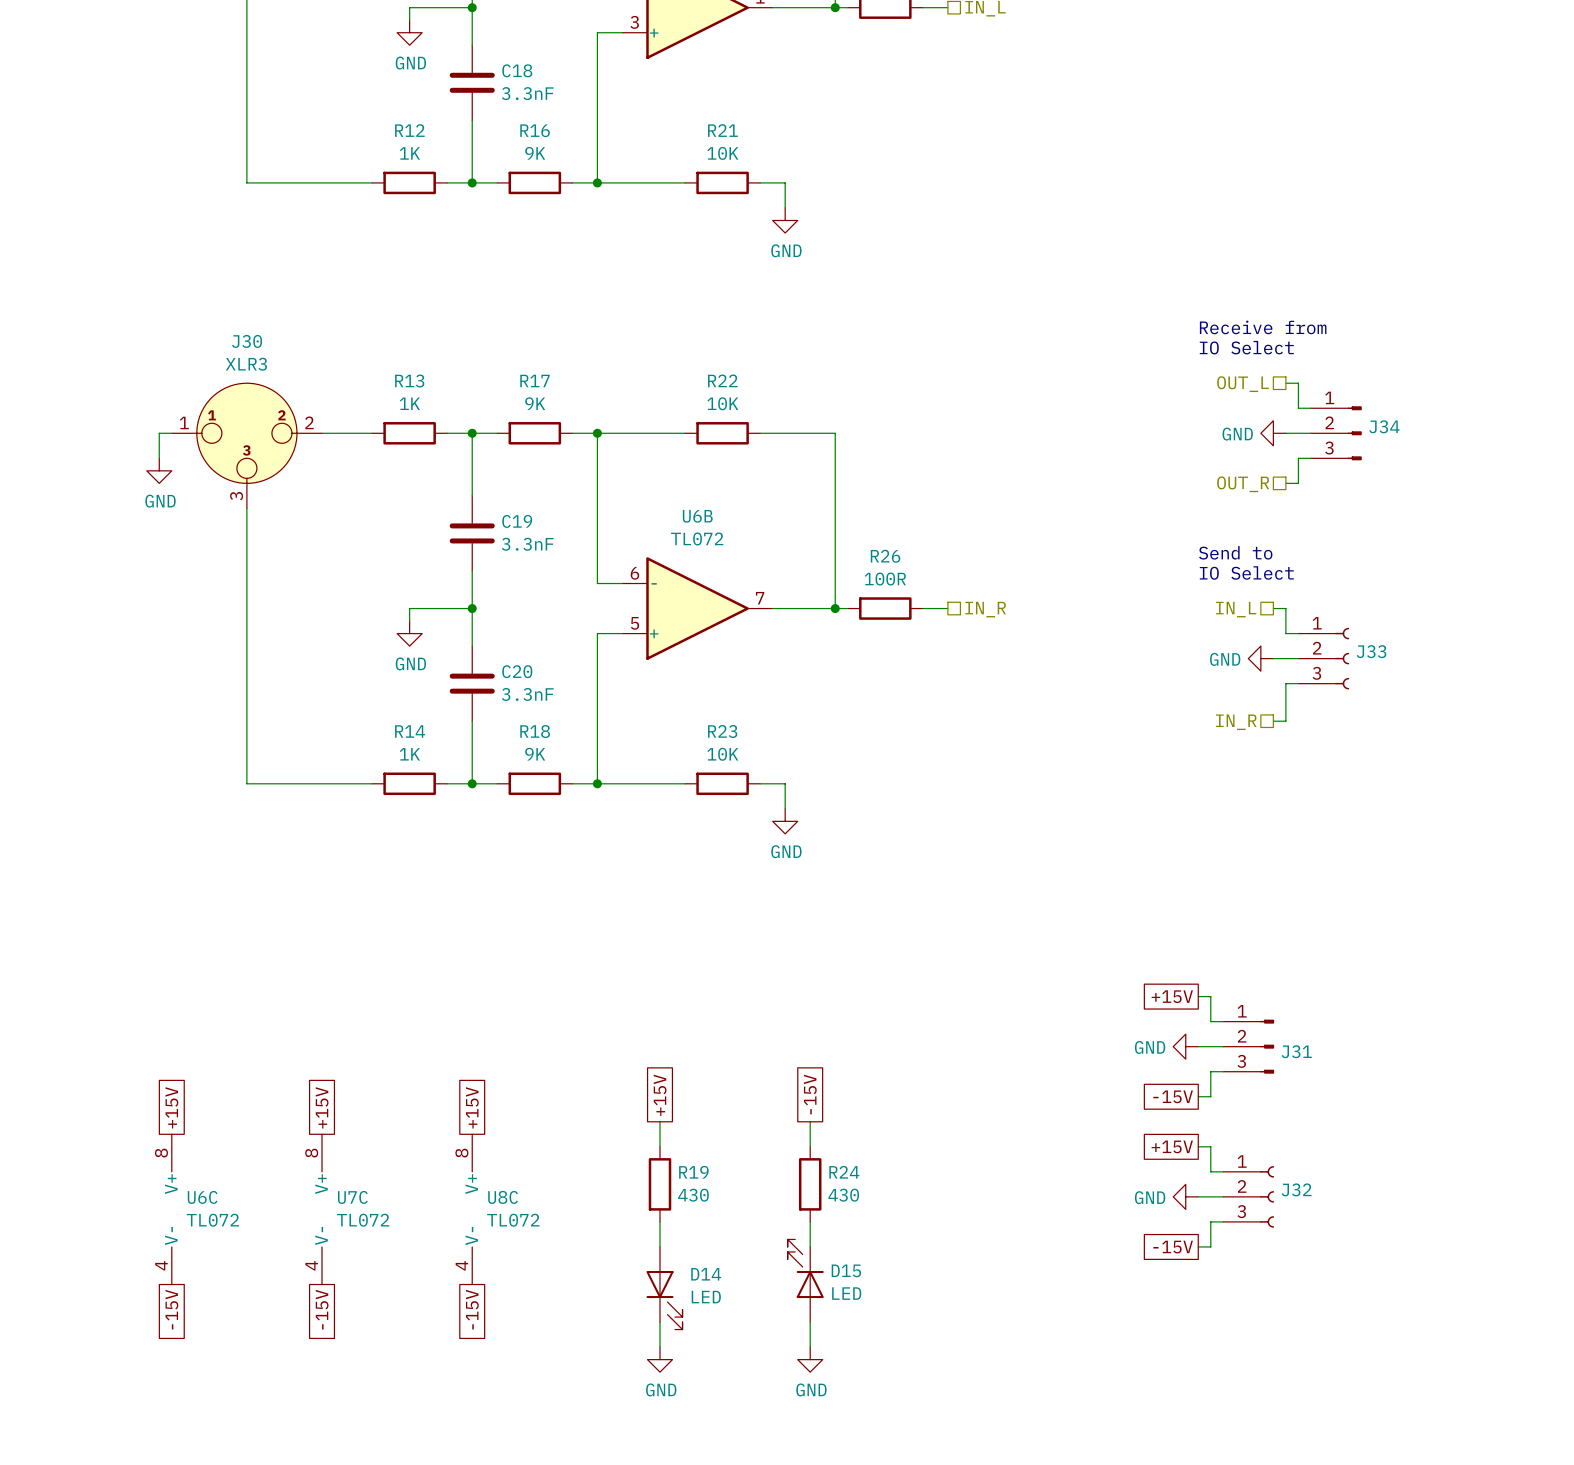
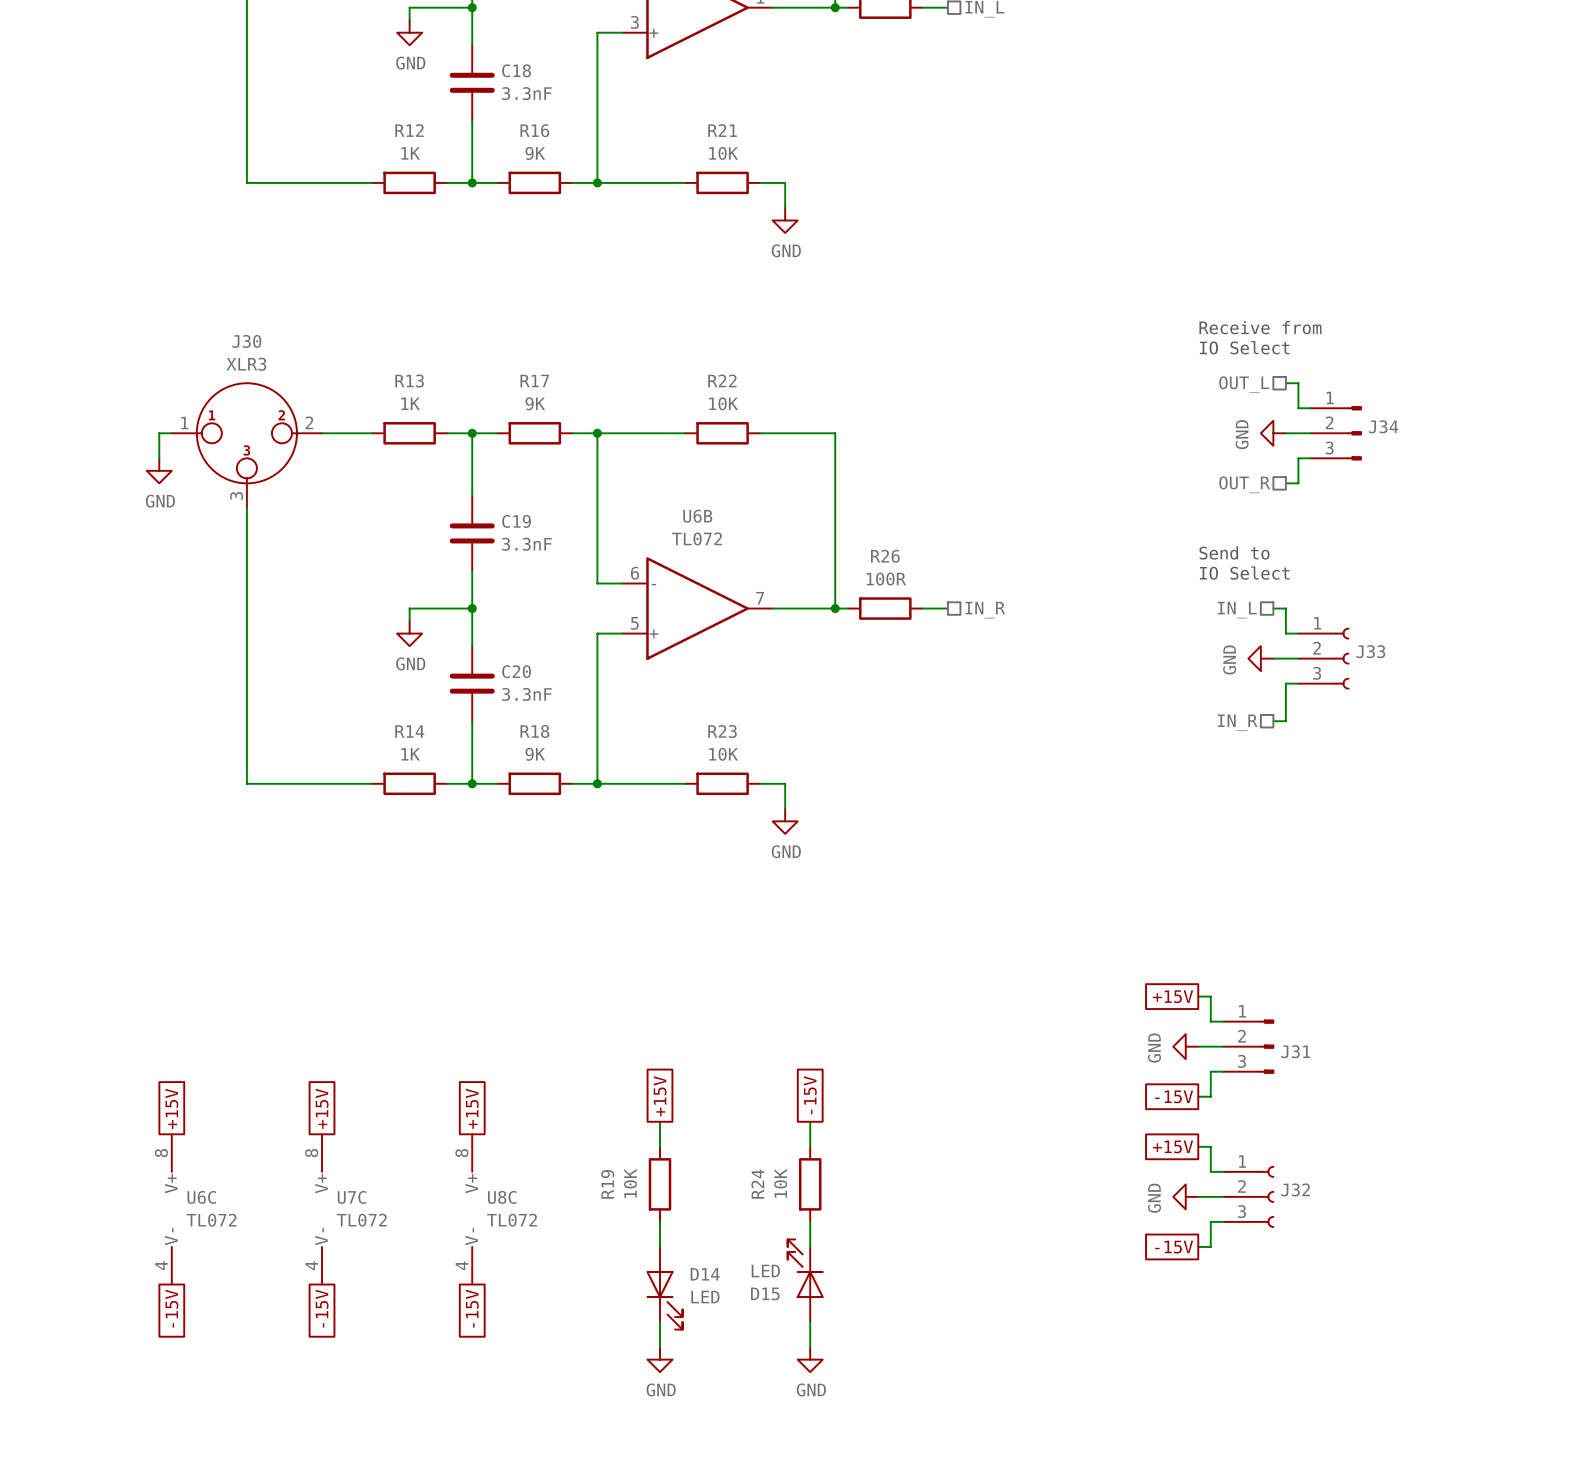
power symbol text rotation: 0° (1237, 434) -> 90° counterclockwise (1242, 434)
power symbol text rotation: 0° (1225, 659) -> 90° counterclockwise (1229, 659)
power symbol text rotation: 0° (1150, 1047) -> 90° counterclockwise (1154, 1048)
R19 name rotation: 0° (693, 1172) -> 90° counterclockwise (607, 1184)
R19 name position: R19 (693, 1172) -> R19 (607, 1184)
R24 name rotation: 0° (844, 1172) -> 90° counterclockwise (757, 1184)
R24 name position: R24 (844, 1172) -> R24 (757, 1184)
R19 value: 430 (693, 1195) -> 10K (630, 1183)
R24 value: 430 (843, 1195) -> 10K (780, 1183)
power symbol text rotation: 0° (1150, 1197) -> 90° counterclockwise (1154, 1198)
D15 name position: D15 (846, 1270) -> D15 (765, 1293)
D15 value position: LED (846, 1293) -> LED (765, 1271)

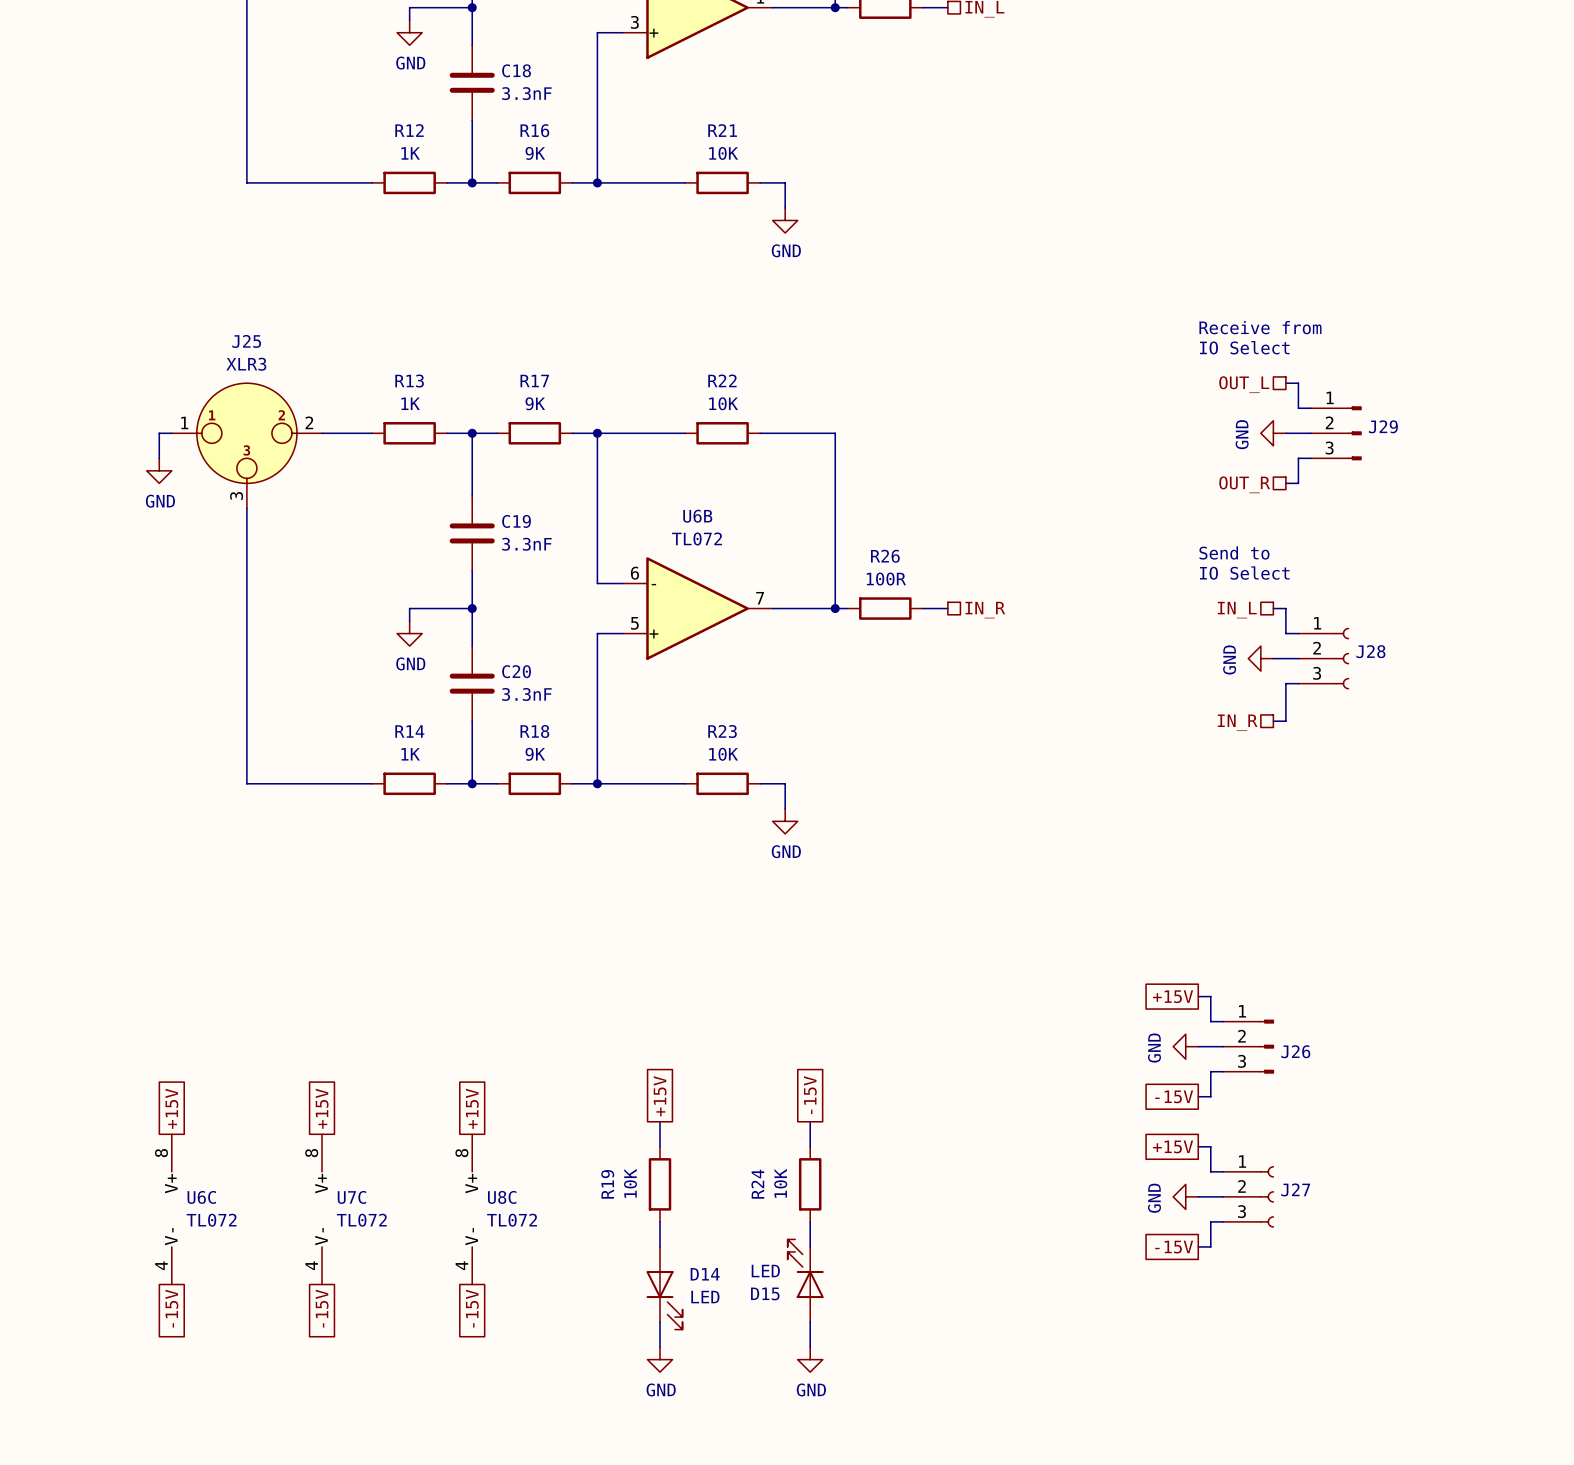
J30 name: J30 (246, 341) -> J25 (246, 341)
J34 name: J34 (1383, 426) -> J29 (1383, 426)
J33 name: J33 (1370, 651) -> J28 (1370, 651)
J31 name: J31 (1295, 1051) -> J26 (1295, 1051)
J32 name: J32 (1295, 1189) -> J27 (1295, 1189)

